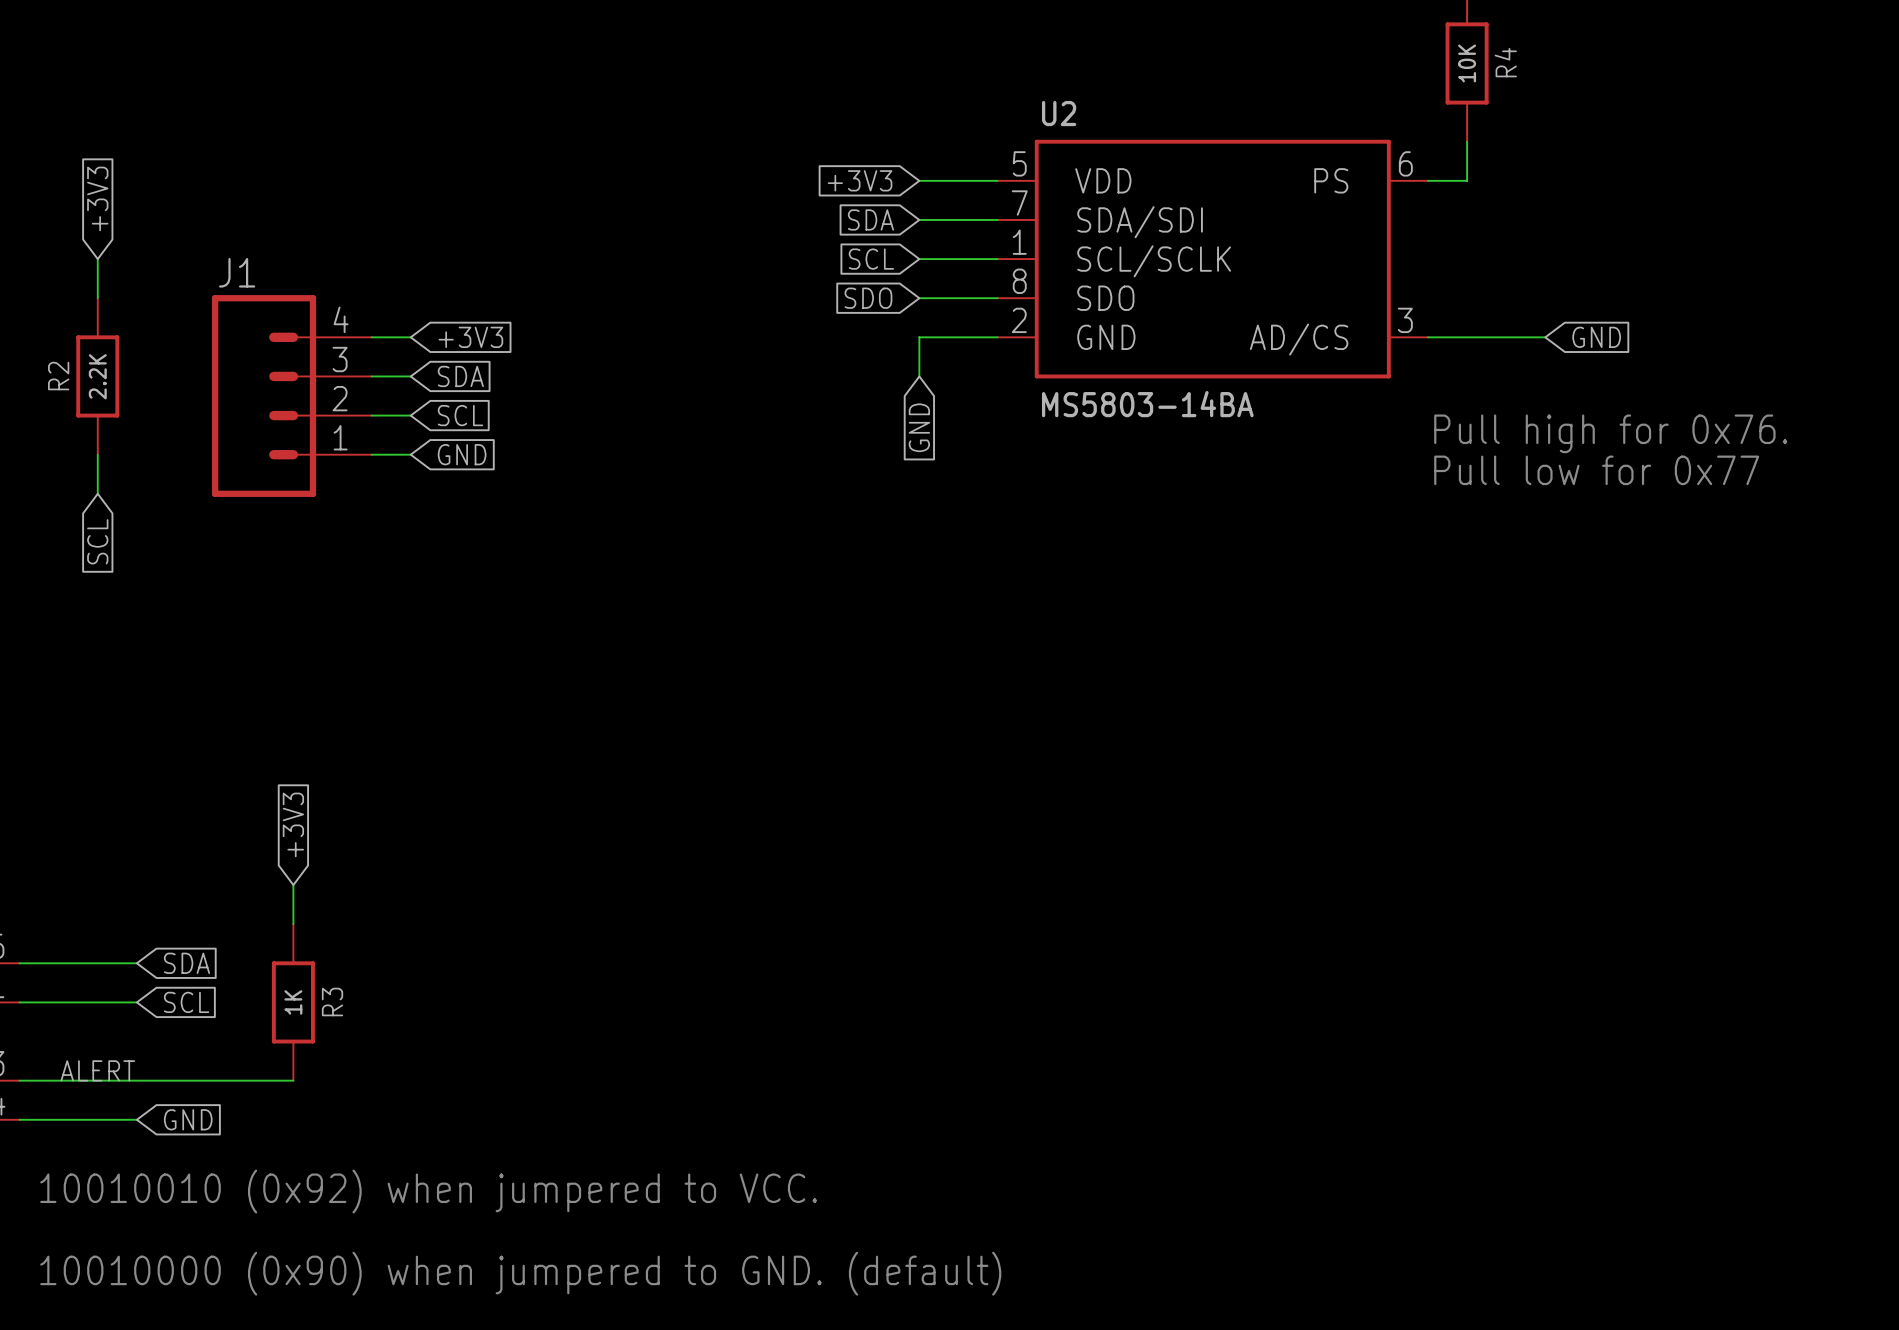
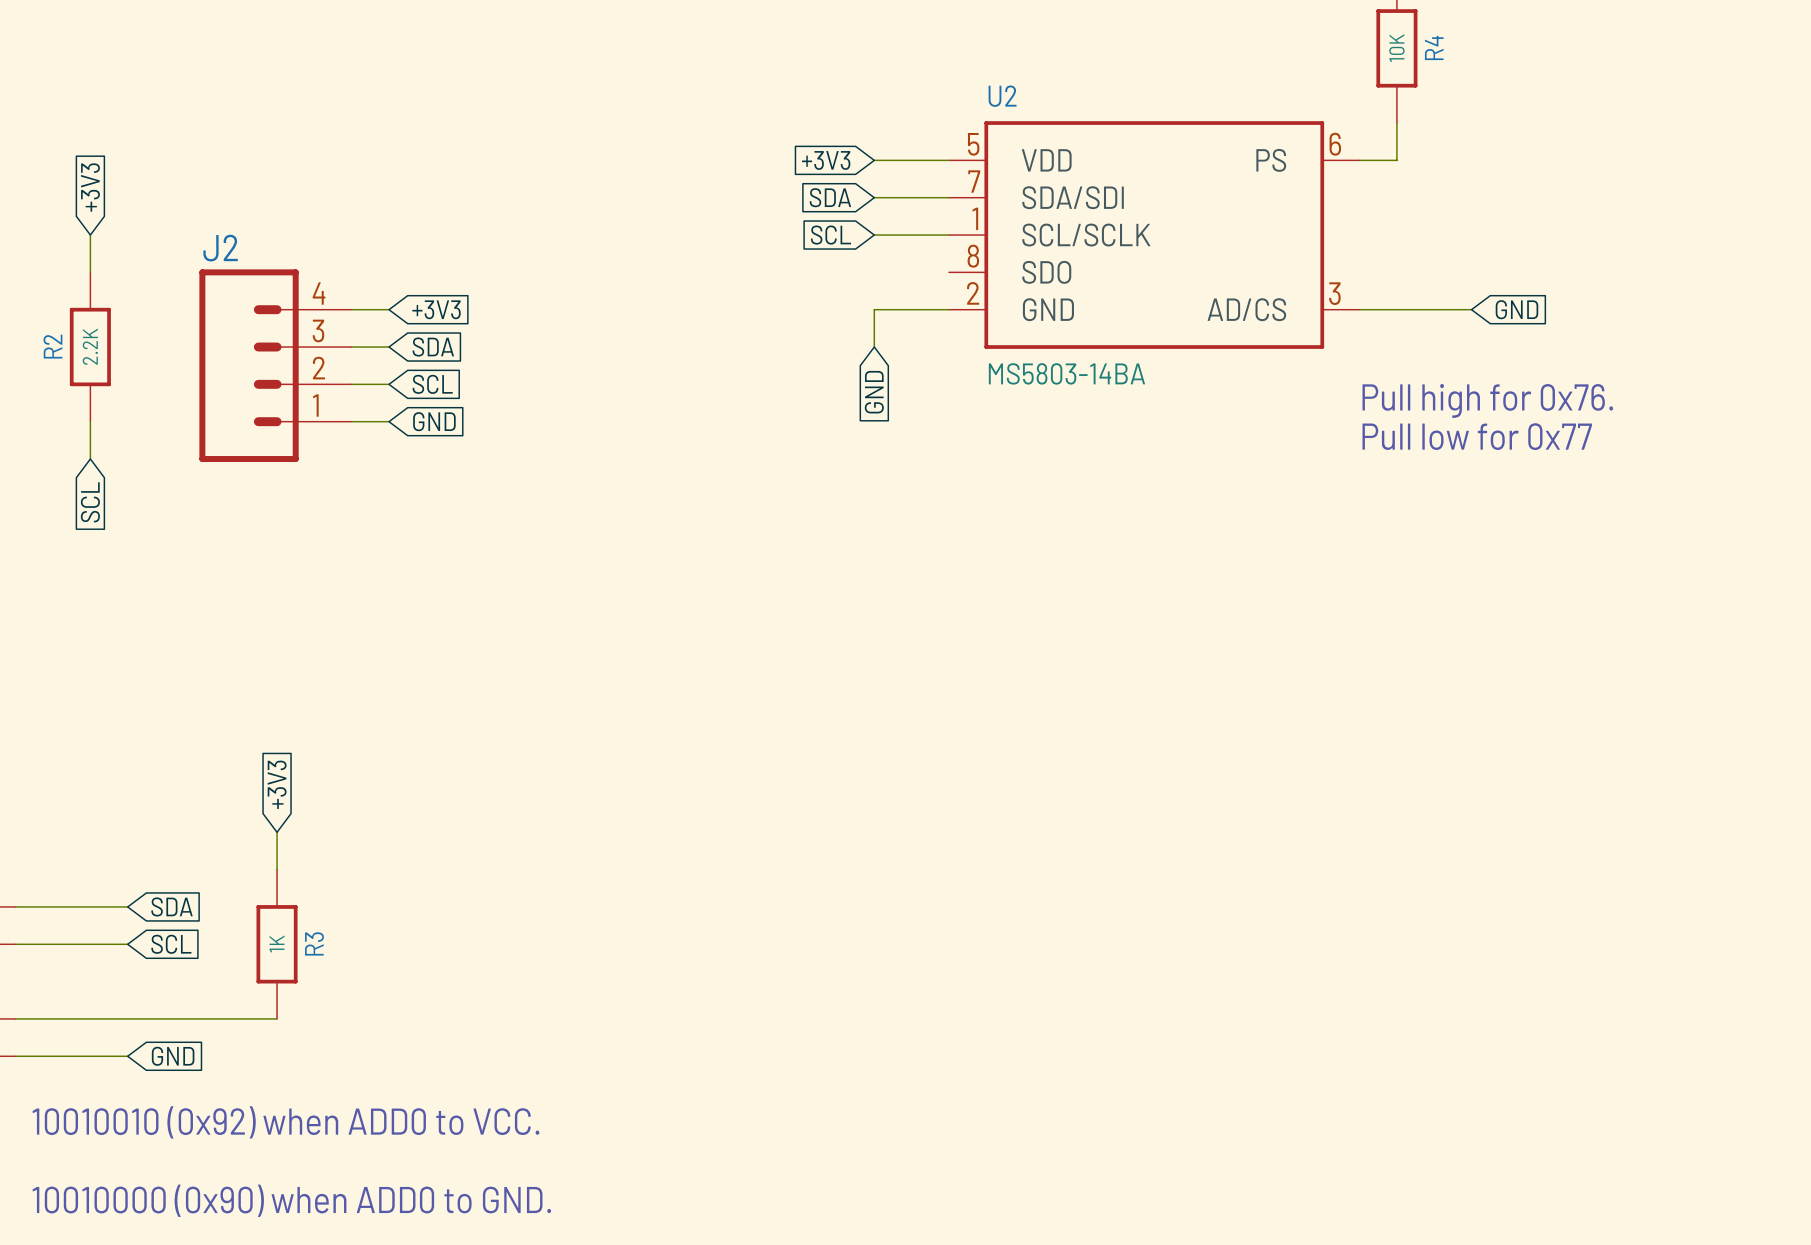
J1 name: J1 (237, 272) -> J2 (220, 248)
global label: SDO (868, 298) -> none
wire: (919, 298) (997, 298) -> none
label: ALERT (97, 1070) -> none
text: 10010010 (0x92) when jumpered to VCC. (428, 1191) -> 10010010 (0x92) when ADD0 to VCC. (285, 1122)
text: 10010000 (0x90) when jumpered to GND. (default) (520, 1273) -> 10010000 (0x90) when ADD0 to GND. (291, 1200)

